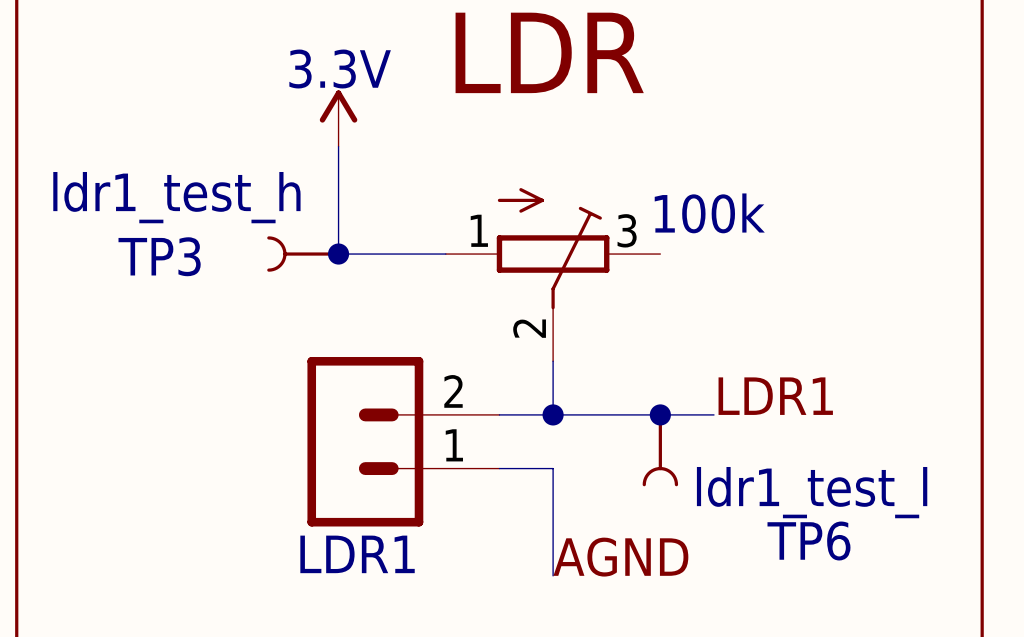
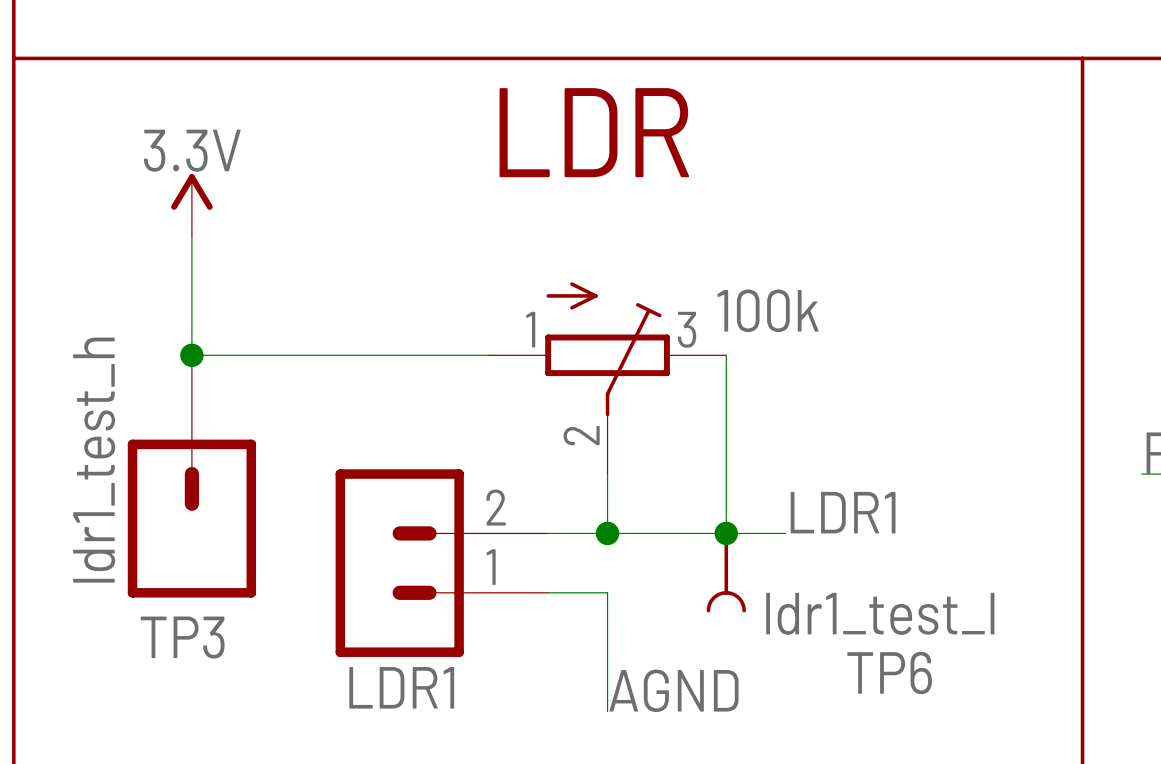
power symbol position: 3.3V (338, 118) -> 3.3V (191, 205)
wire: (338, 146) (338, 254) -> (191, 236) (191, 355) (370, 355)
TP3 symbol: [267, 236, 341, 272] -> [127, 355, 257, 598]
junction: none -> (191, 355)
junction: (338, 254) -> none
wire: none -> (726, 355) (726, 533)
TP3 name position: TP3 (159, 256) -> TP3 (182, 637)

